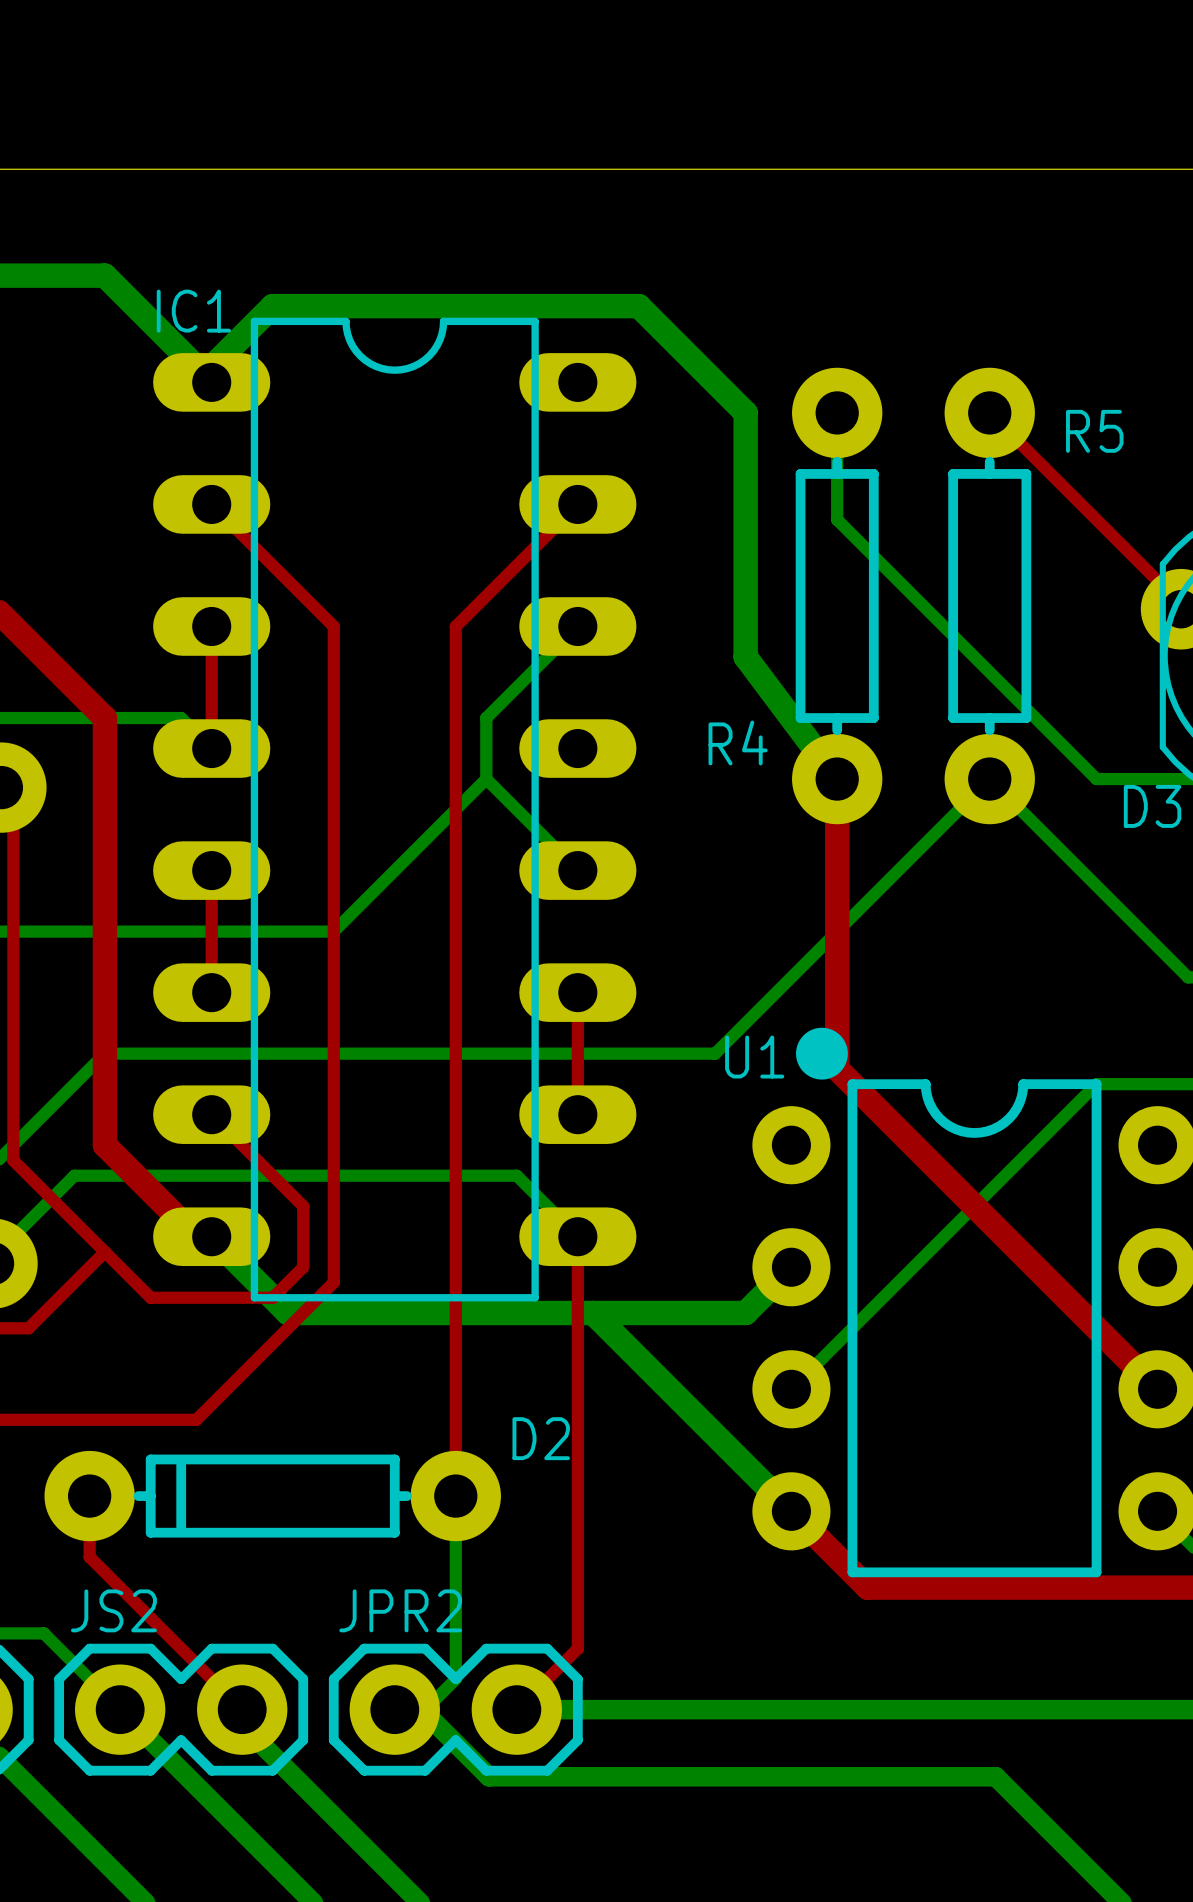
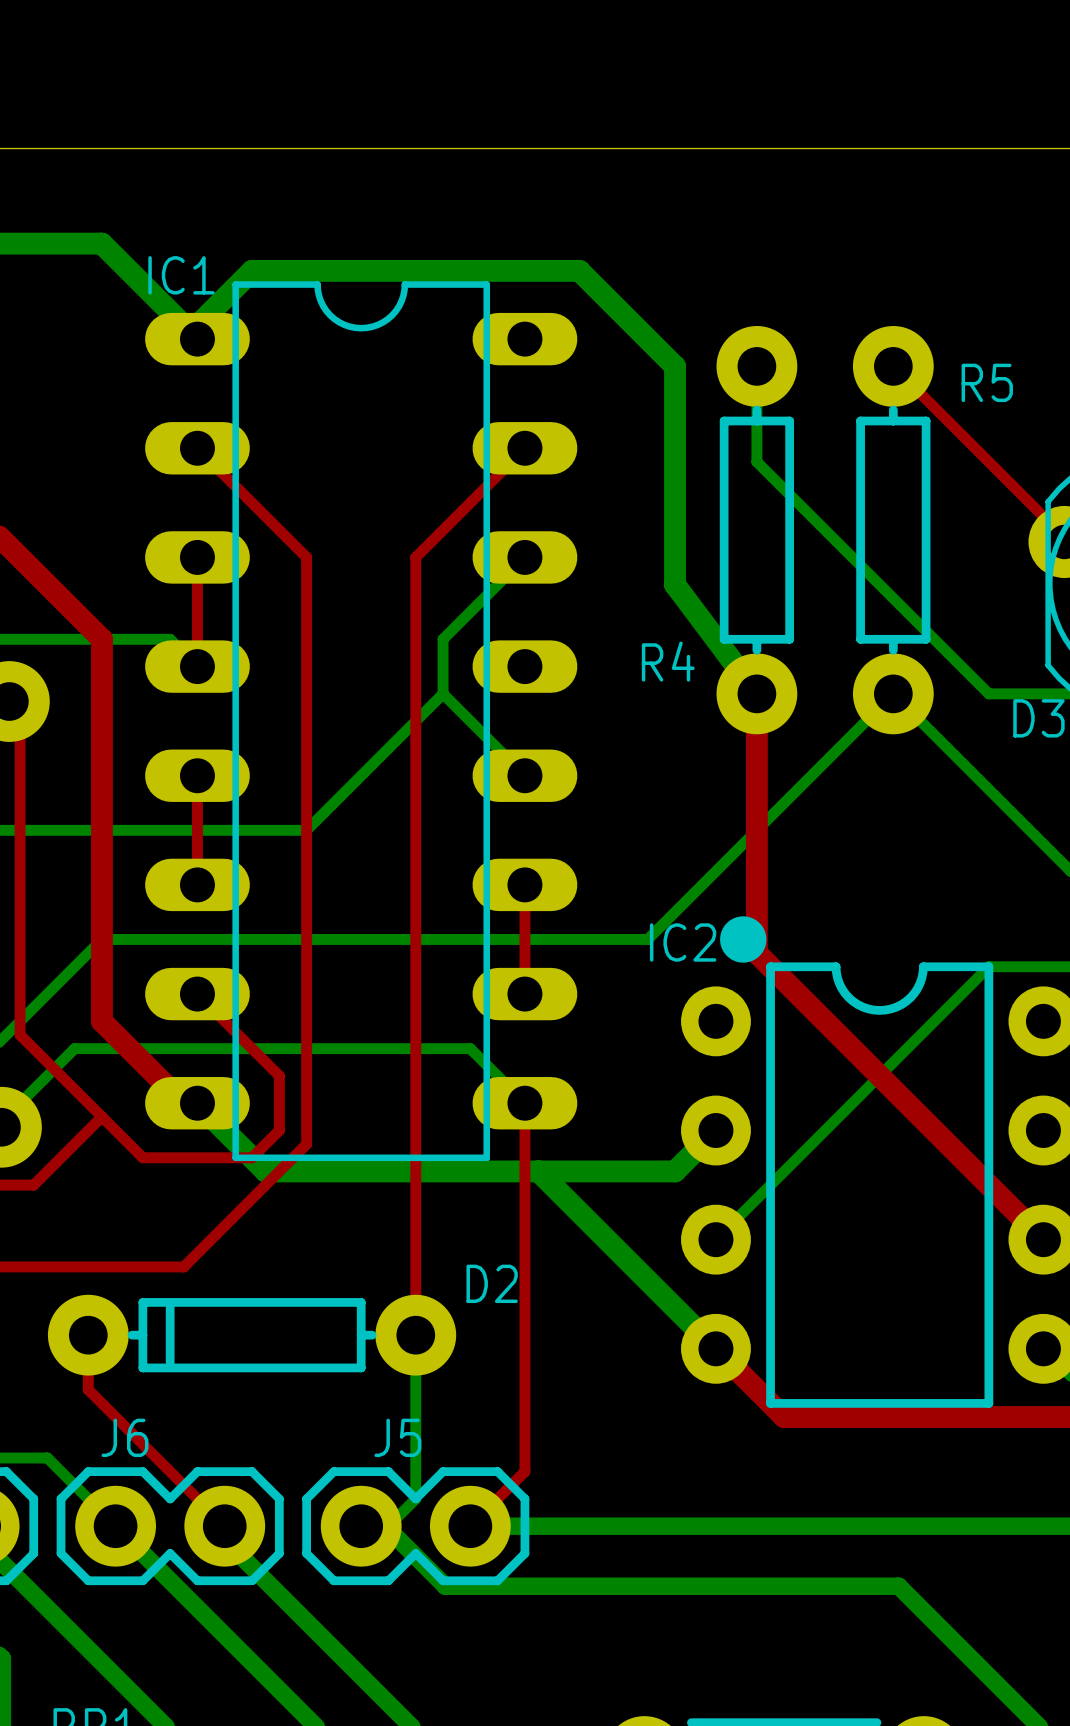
U1 name: U1 (754, 1057) -> IC2 (683, 942)
JS2 name: JS2 (113, 1610) -> J6 (125, 1437)
JPR2 name: JPR2 (400, 1610) -> J5 (397, 1437)

